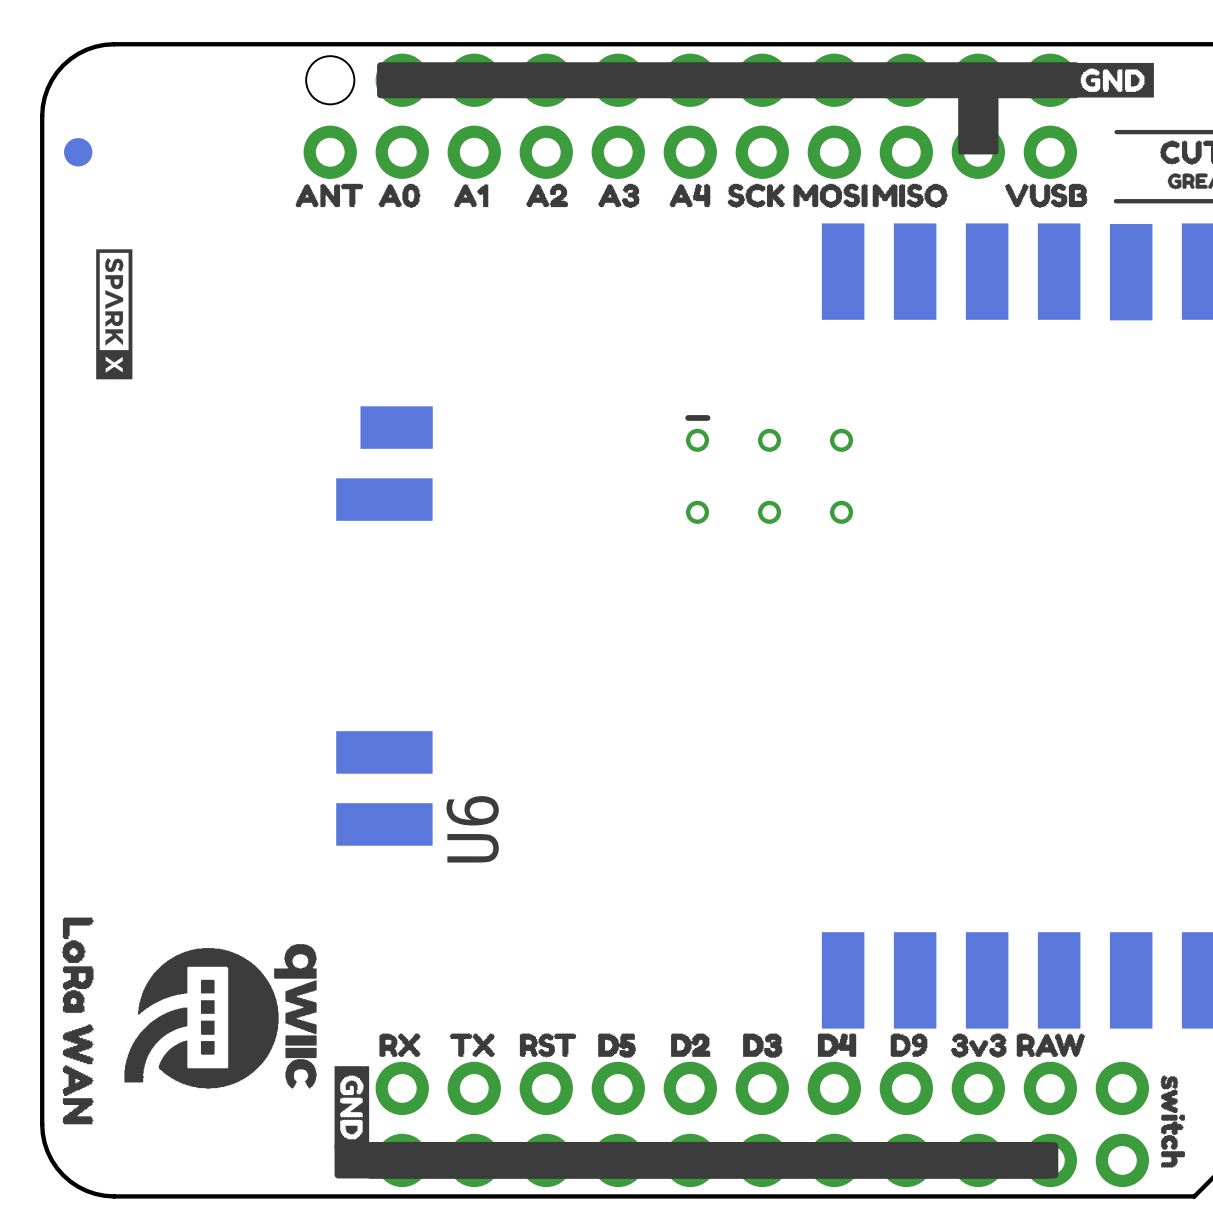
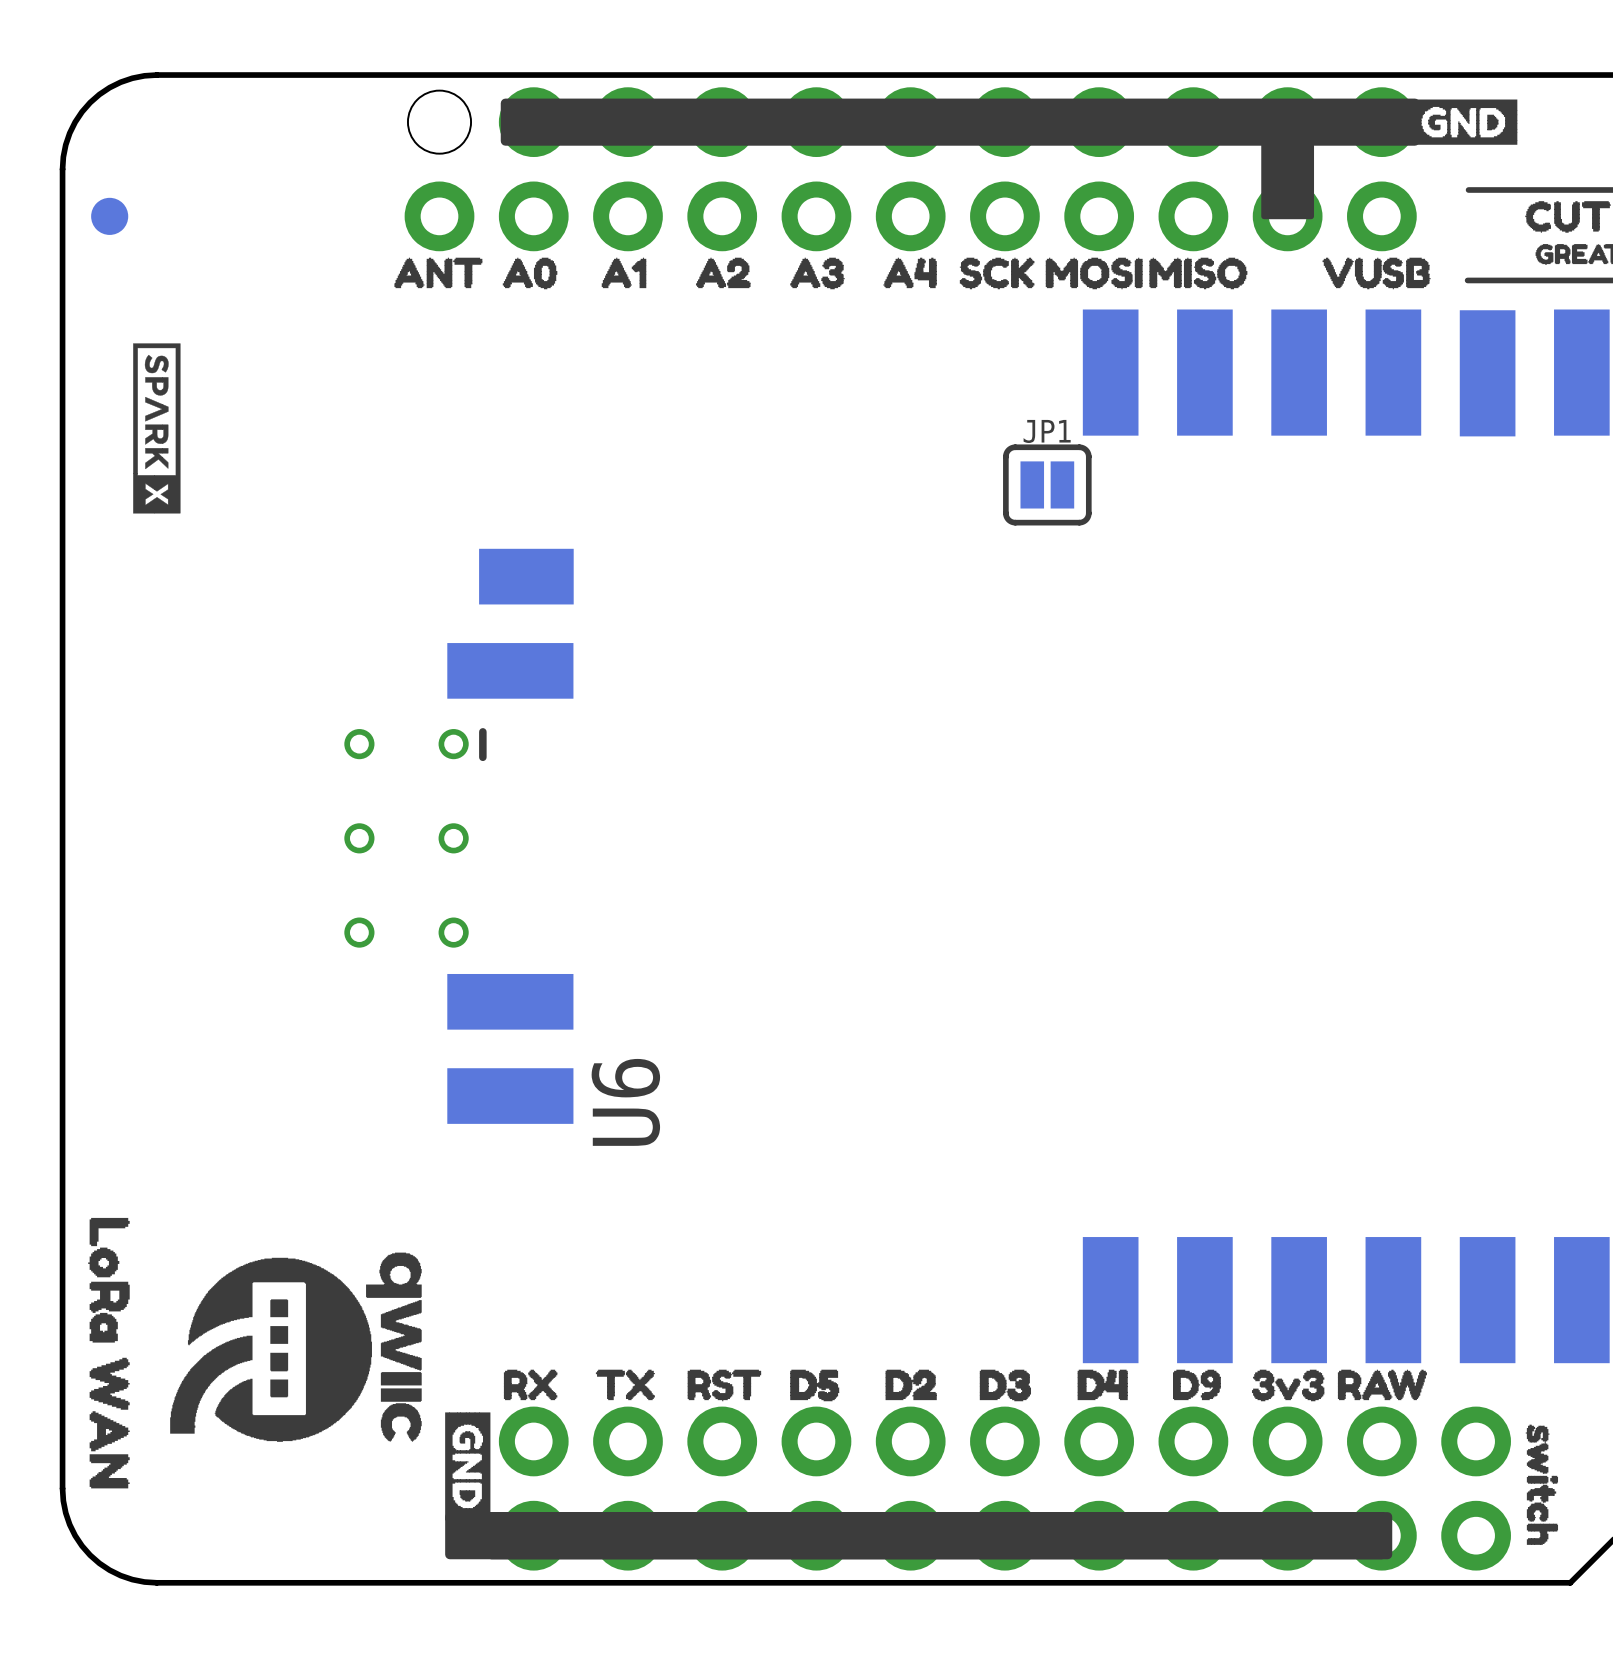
JP1: none -> (1047, 484)
part rotation: 0° (769, 469) -> 90° clockwise (415, 837)
part position: (769, 469) -> (415, 837)

